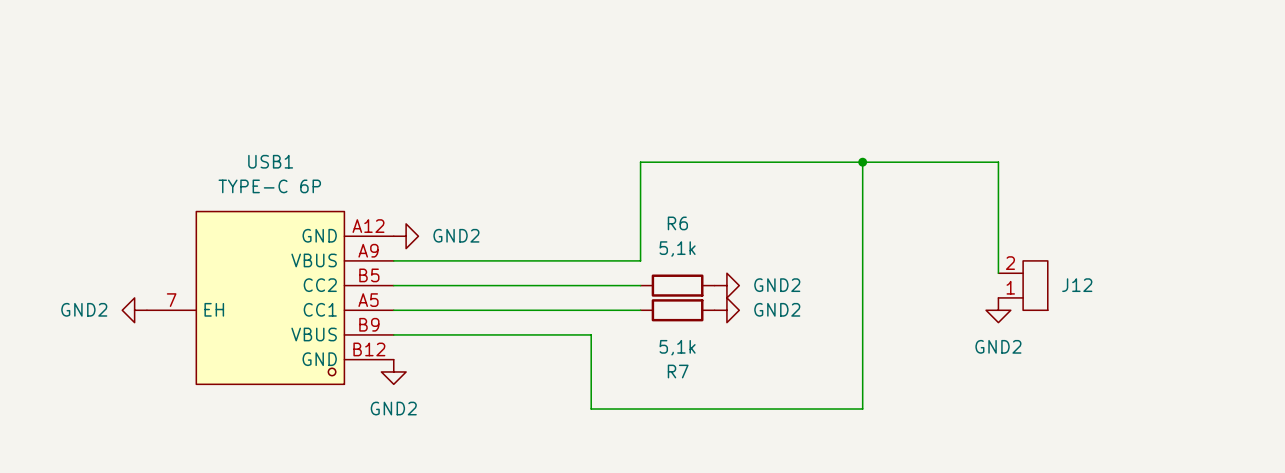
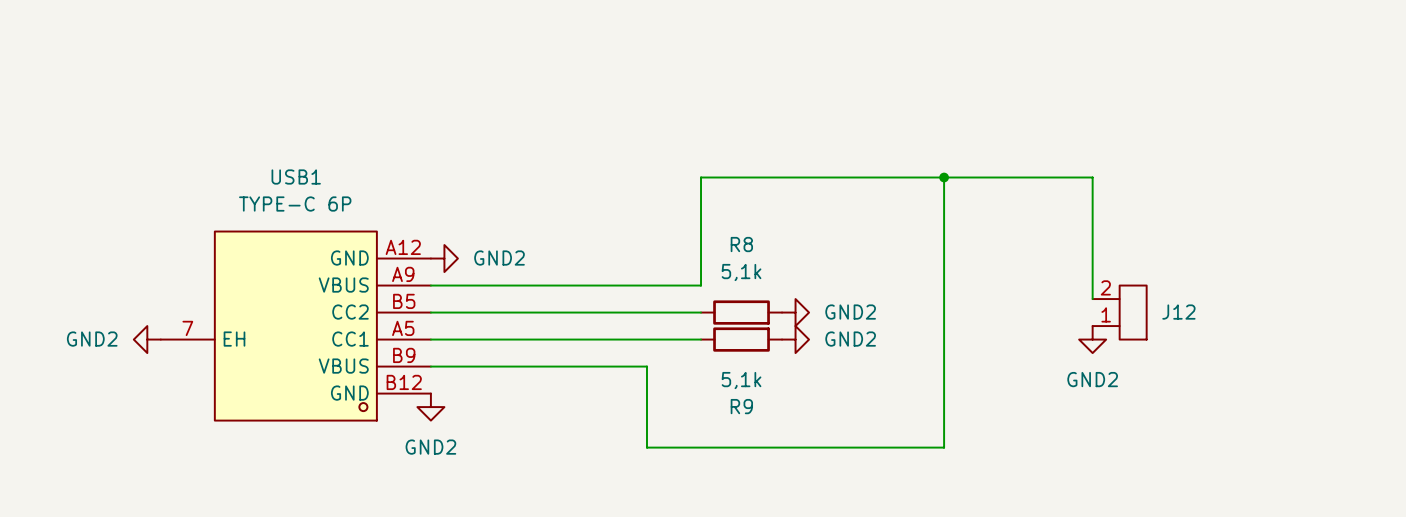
R6 name: R6 (677, 223) -> R8 (741, 244)
R7 name: R7 (678, 371) -> R9 (741, 406)

